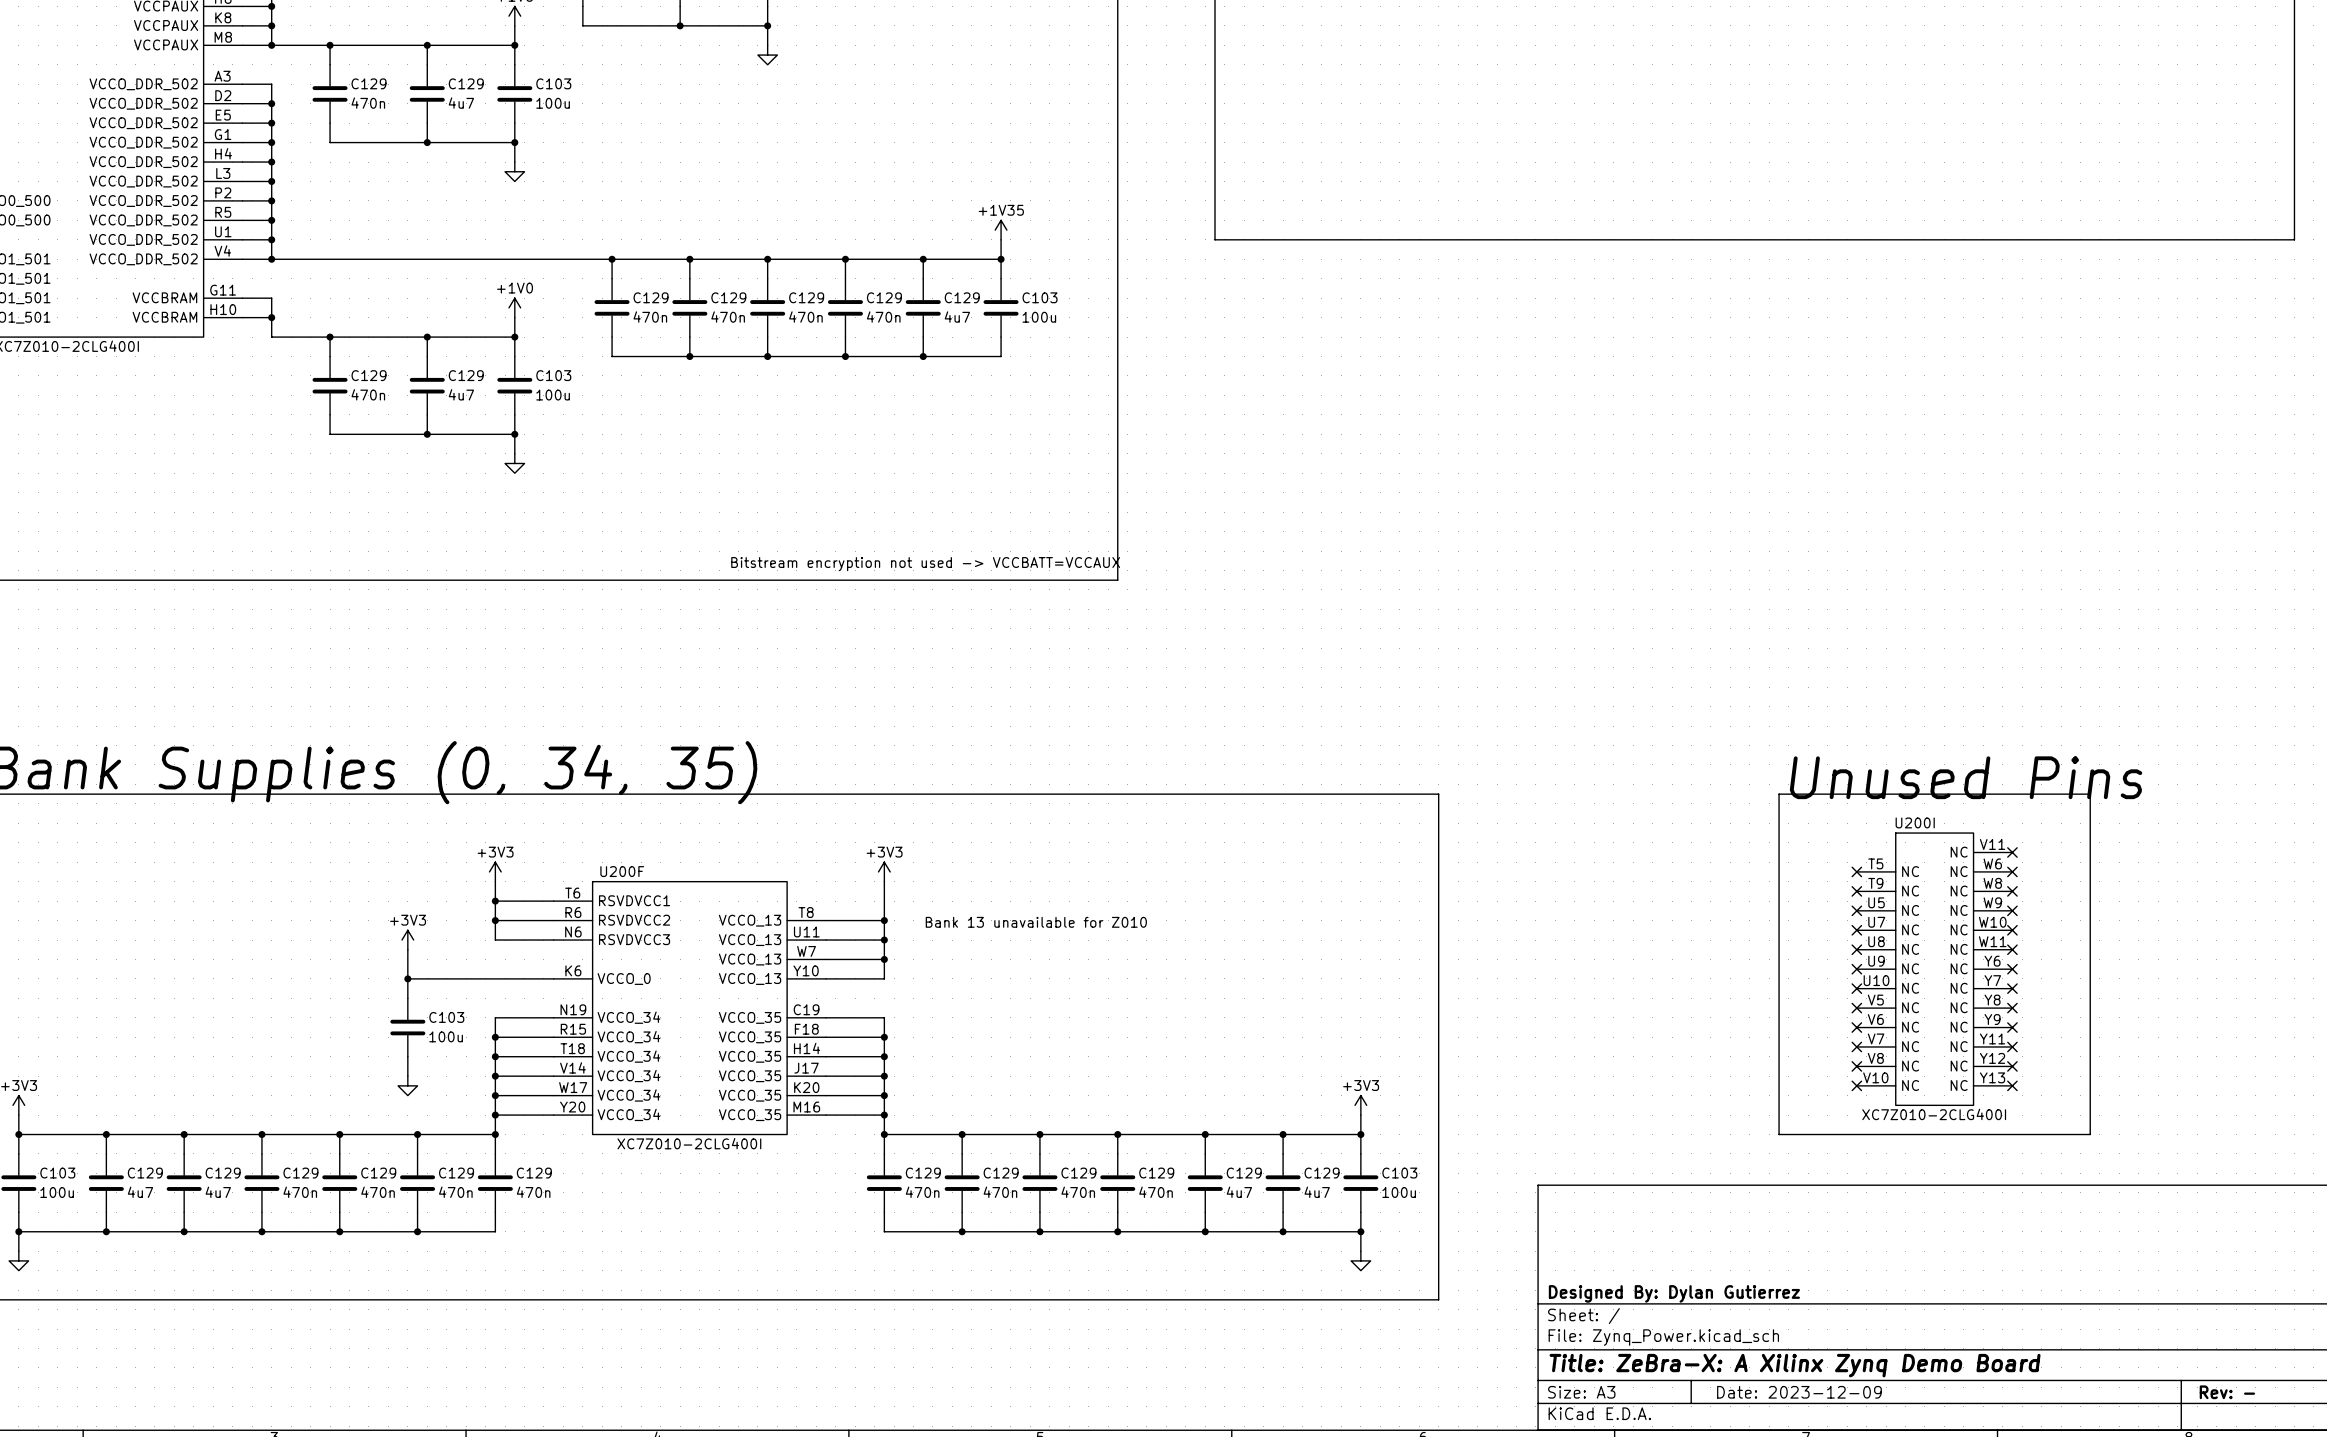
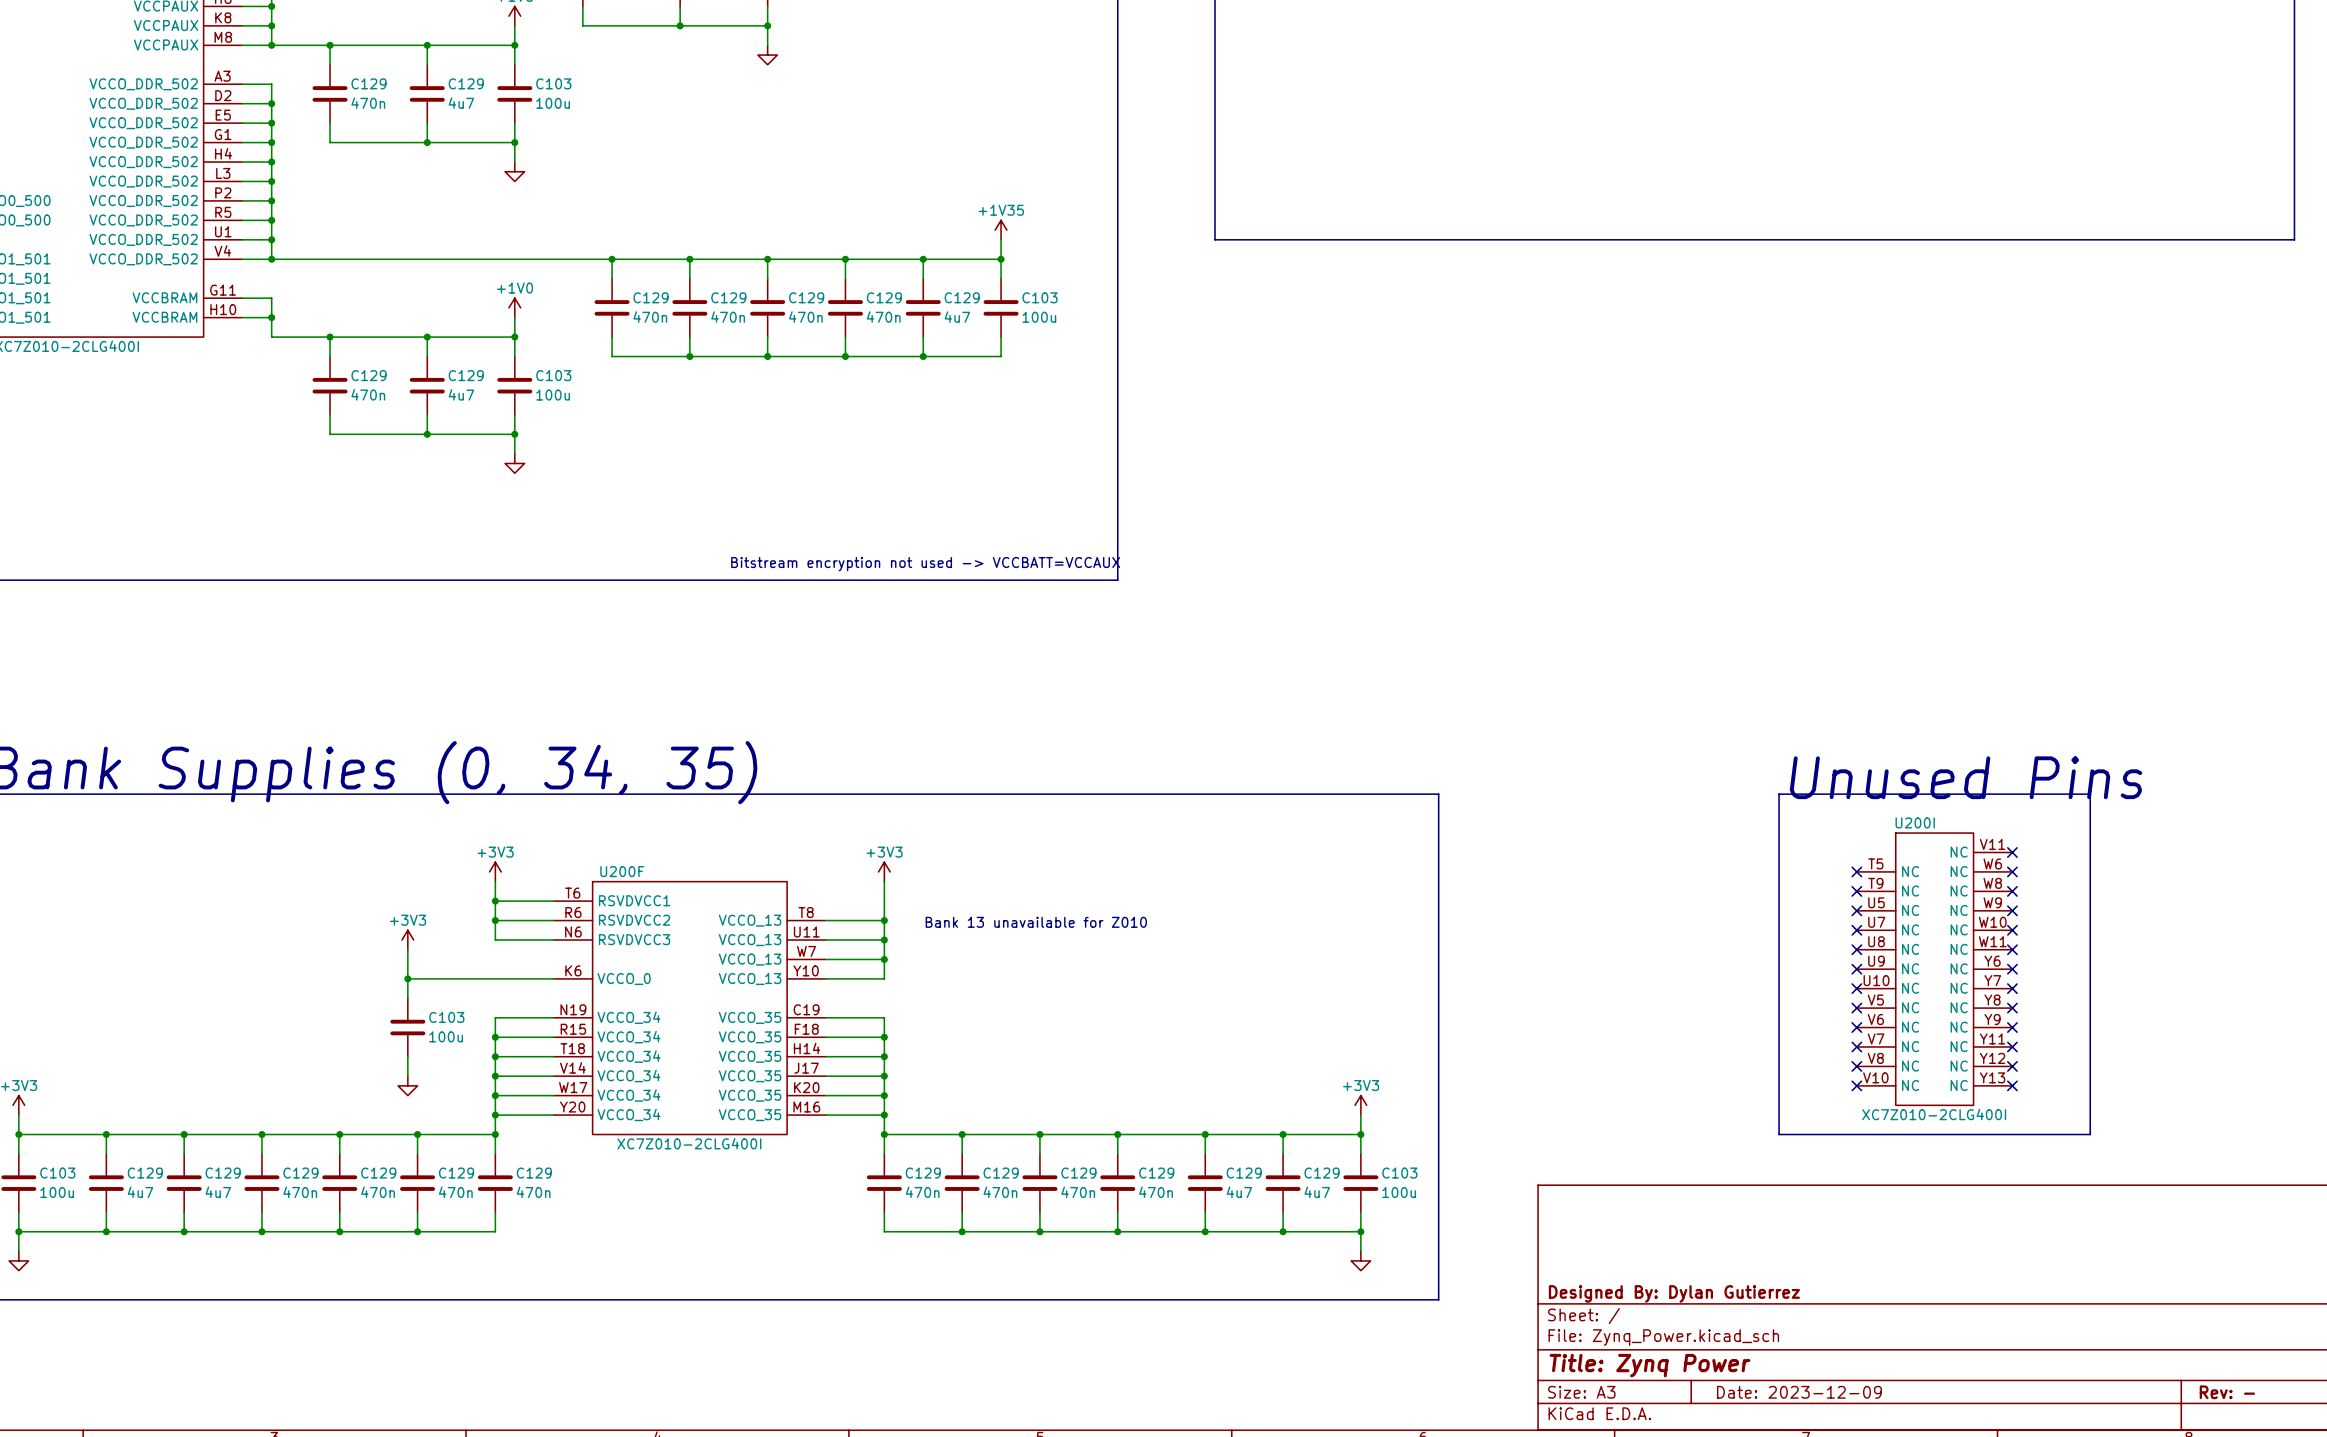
title block: Title: ZeBra-X: A Xilinx Zynq Demo Board (1795, 1365) -> Title: Zynq Power (1649, 1365)

